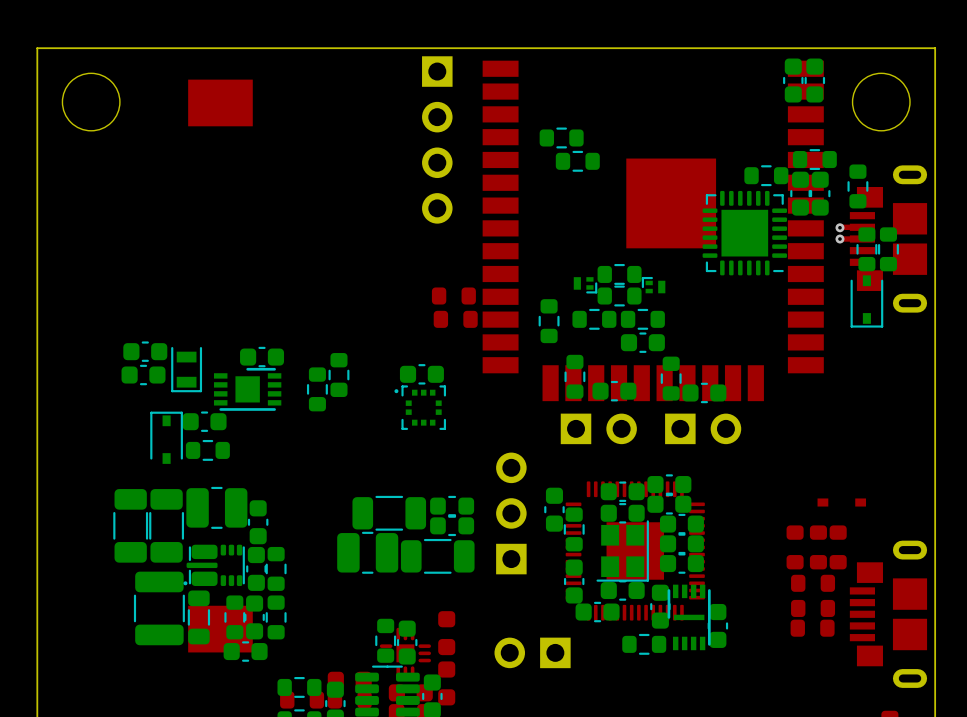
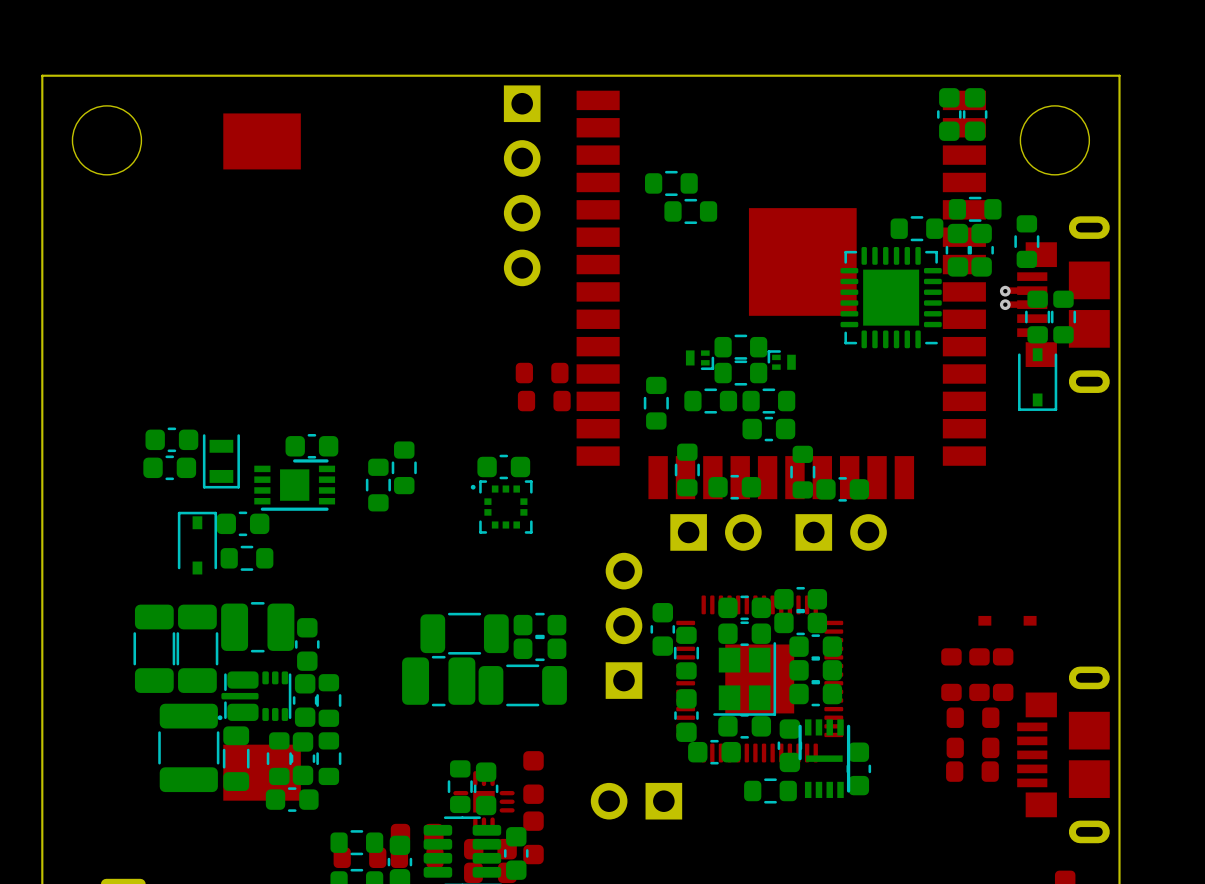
part position: (511, 513) -> (623, 625)

